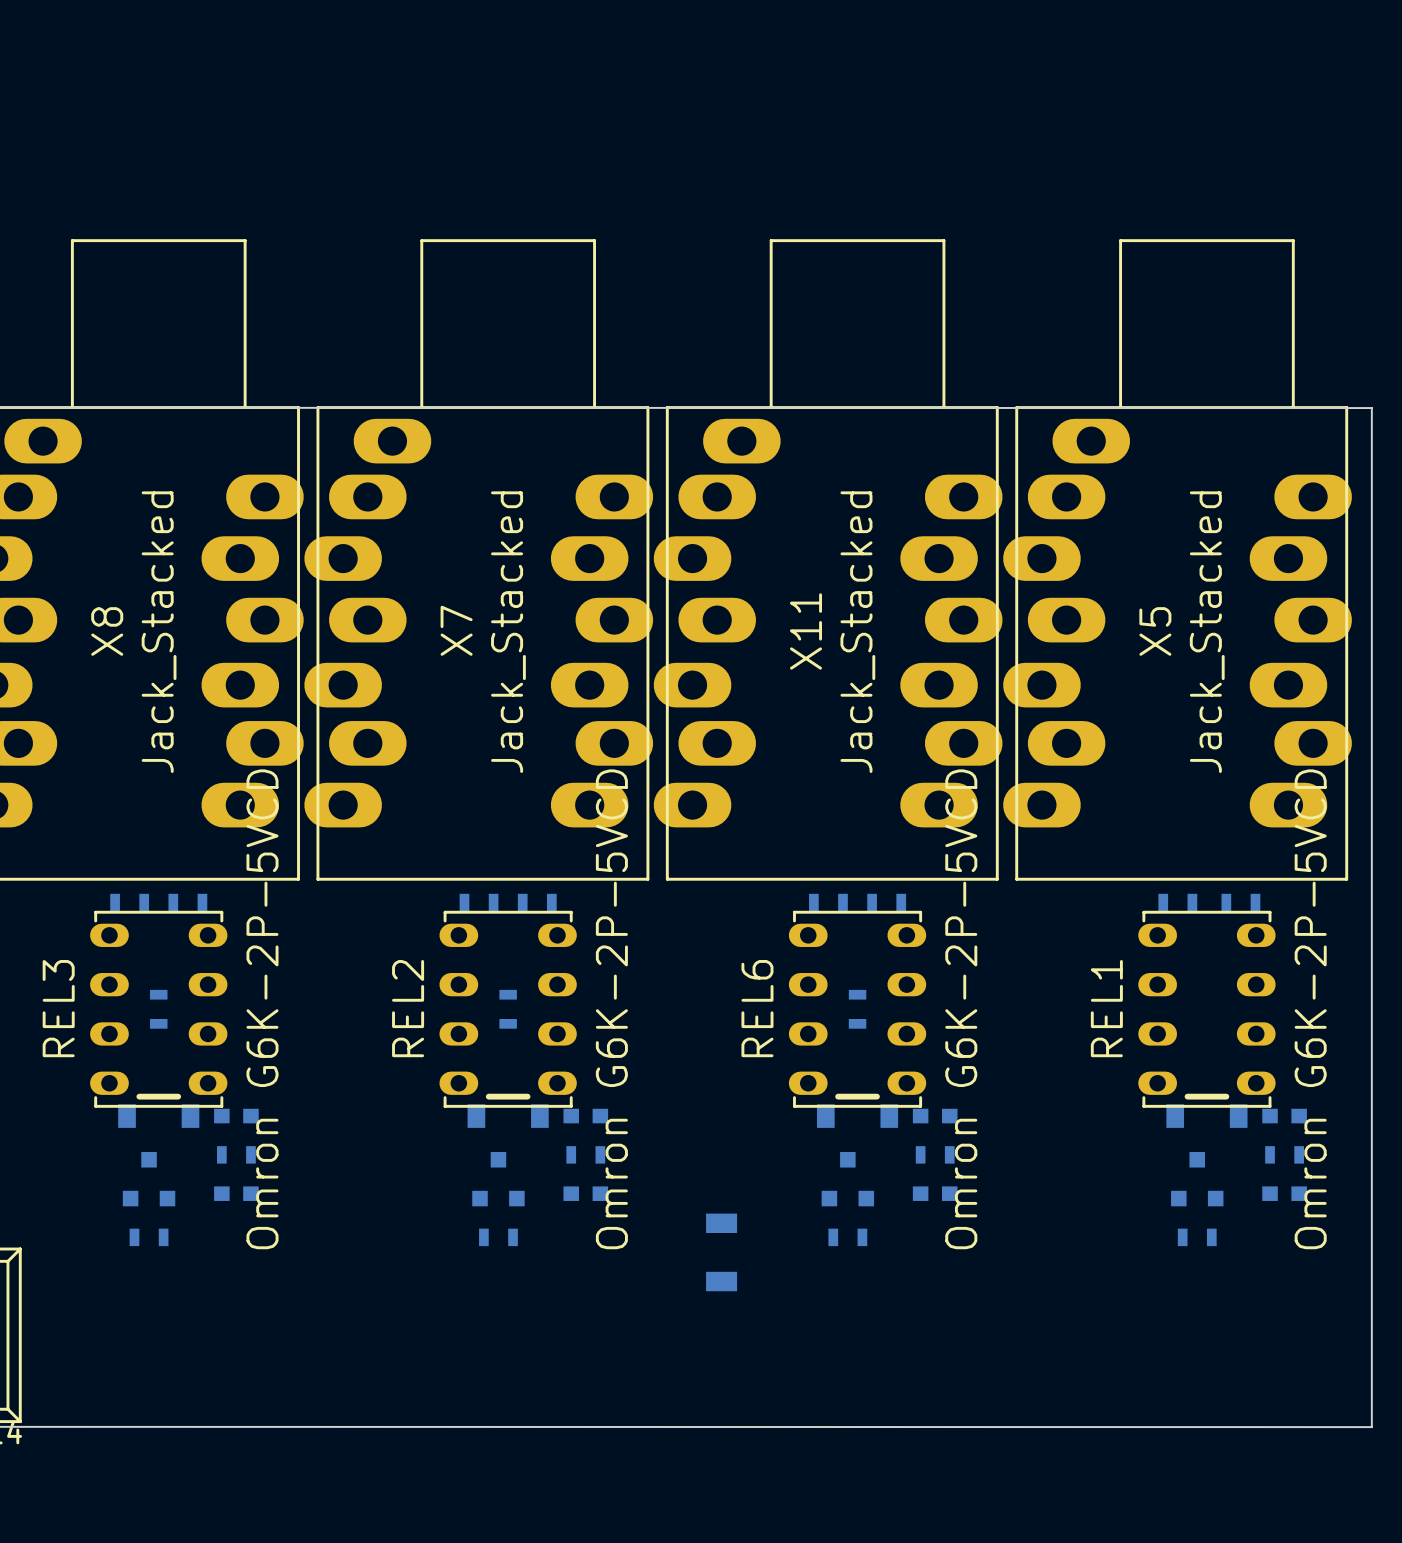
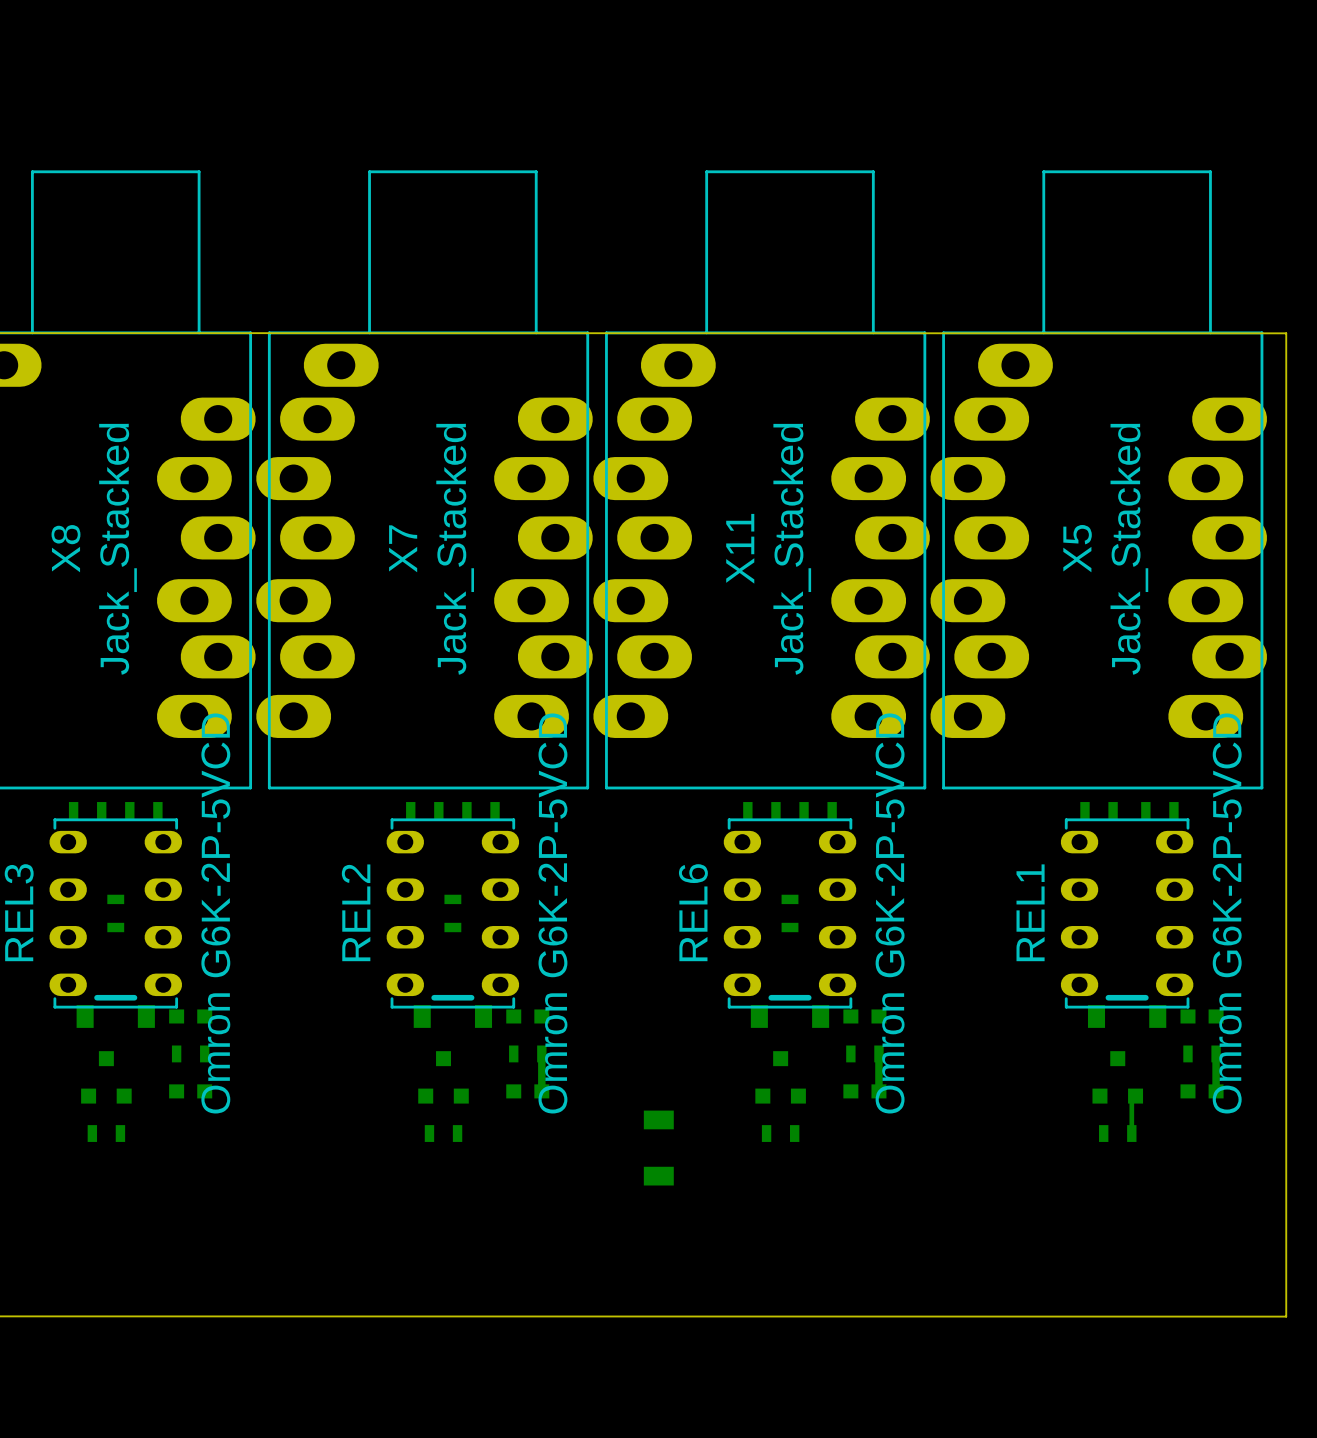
bottom track: none -> (541, 1053) (541, 1091)
bottom track: none -> (878, 1053) (878, 1091)
bottom track: none -> (1216, 1053) (1216, 1091)
bottom track: none -> (1135, 1096) (1131, 1099) (1131, 1133)

